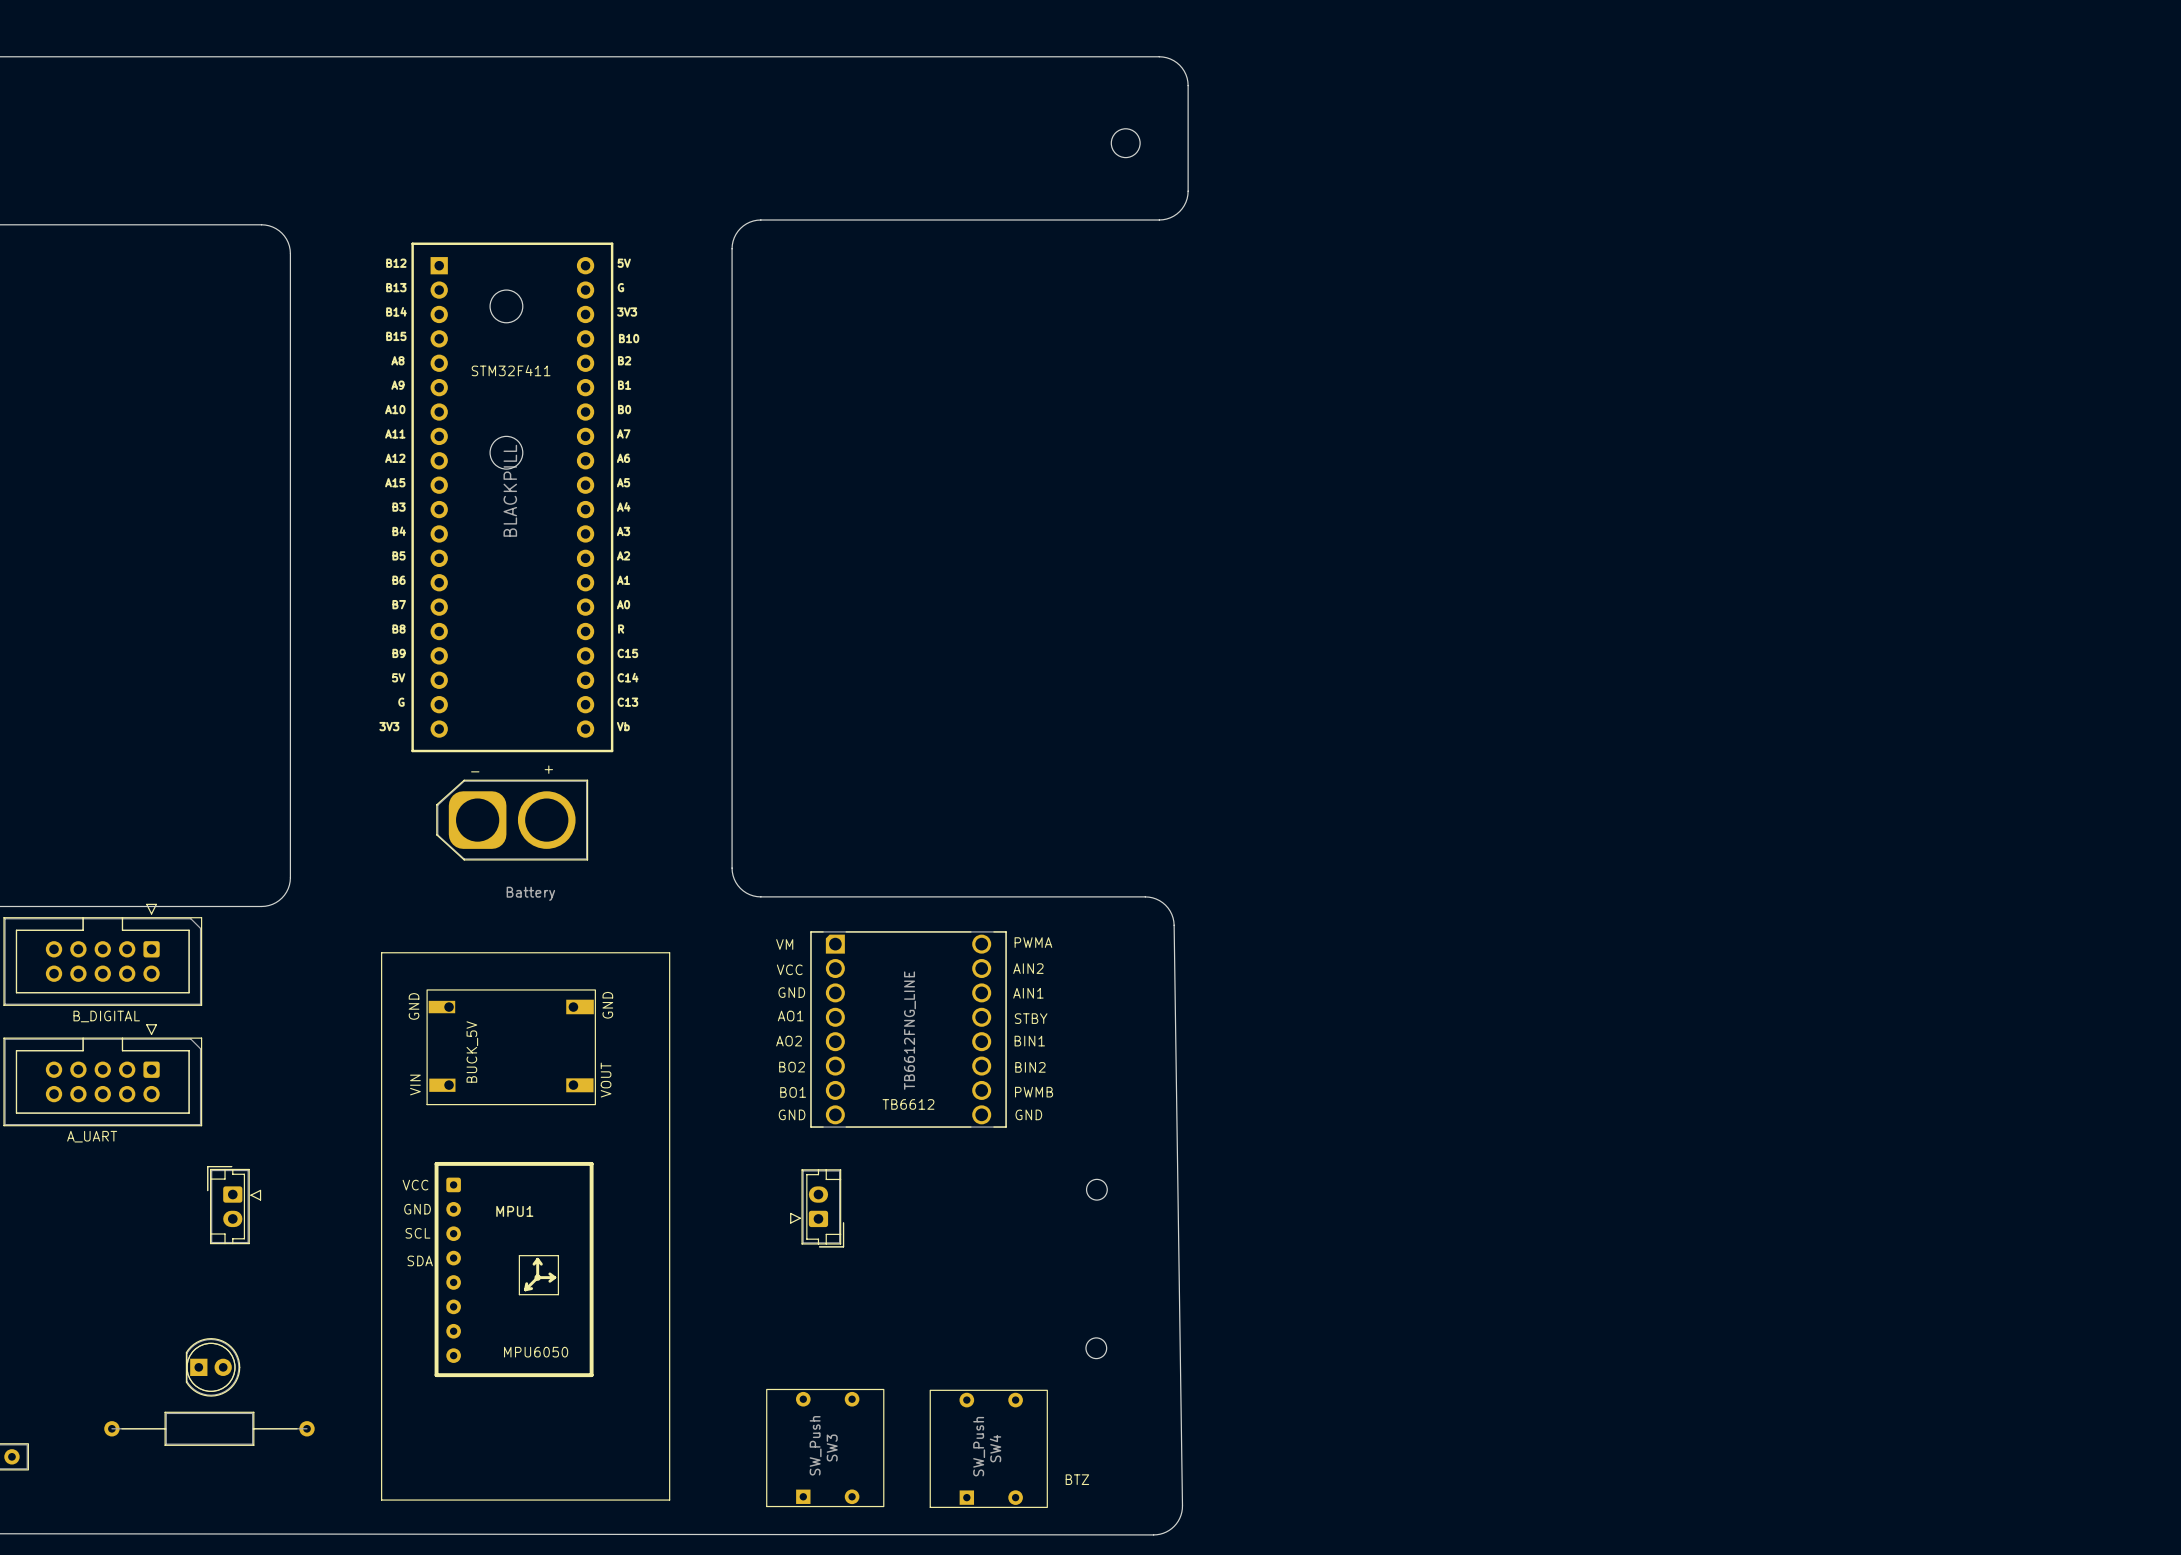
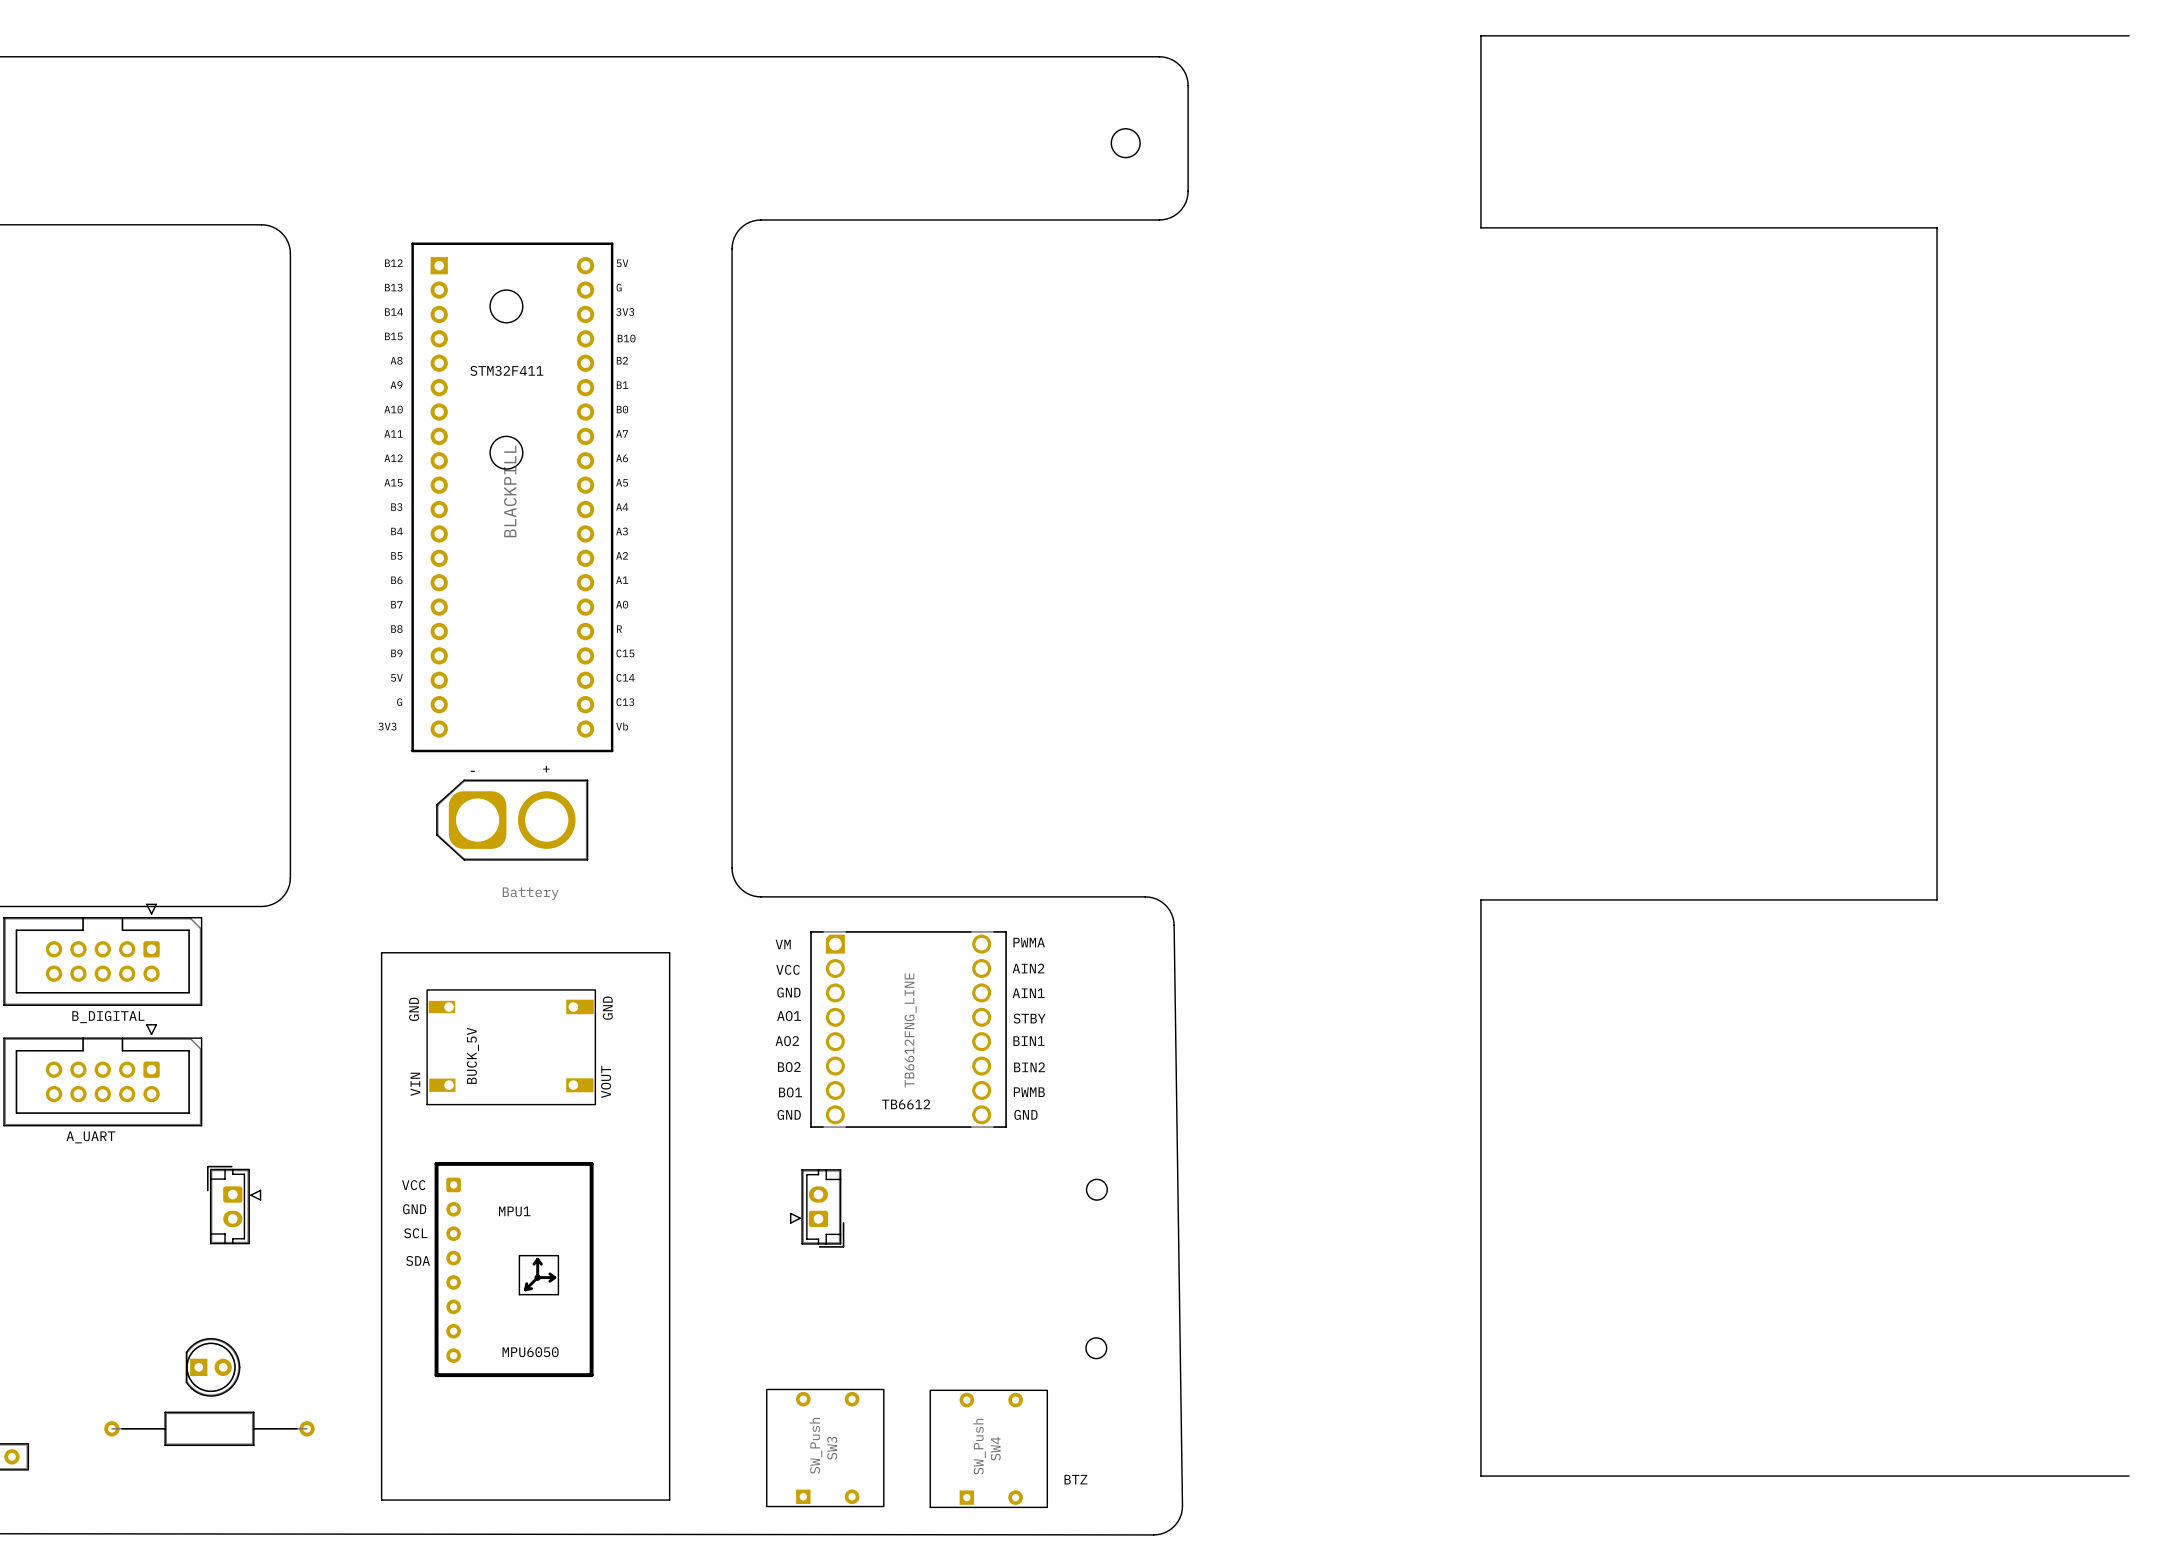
board edge: none -> (2129, 35) (1480, 35) (1480, 227) (1937, 227) (1937, 899) (1480, 899) (1480, 1476) (2129, 1476)

